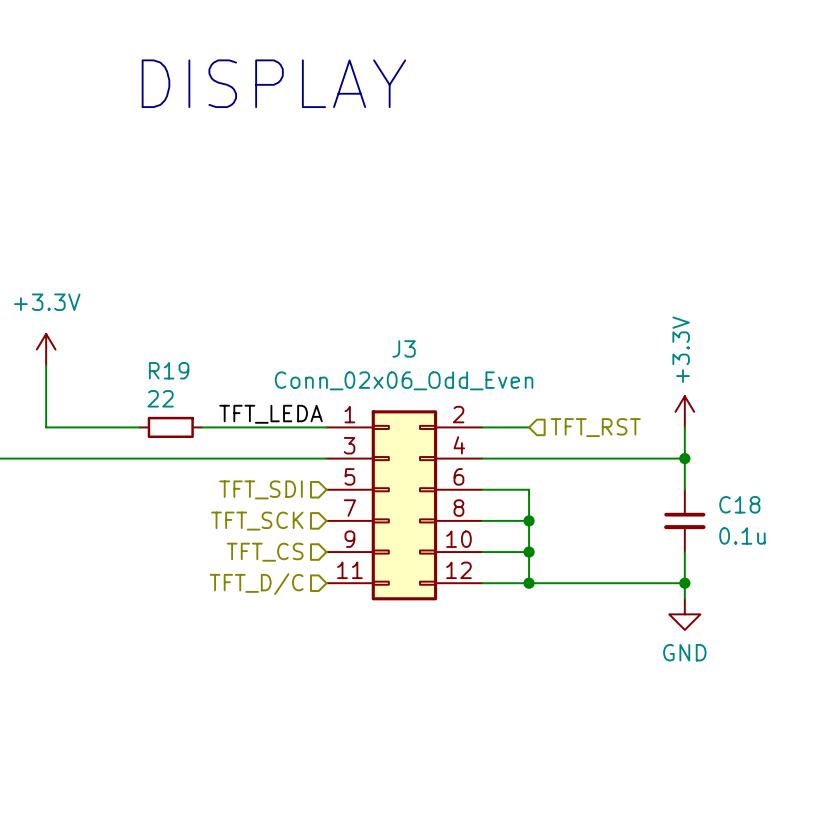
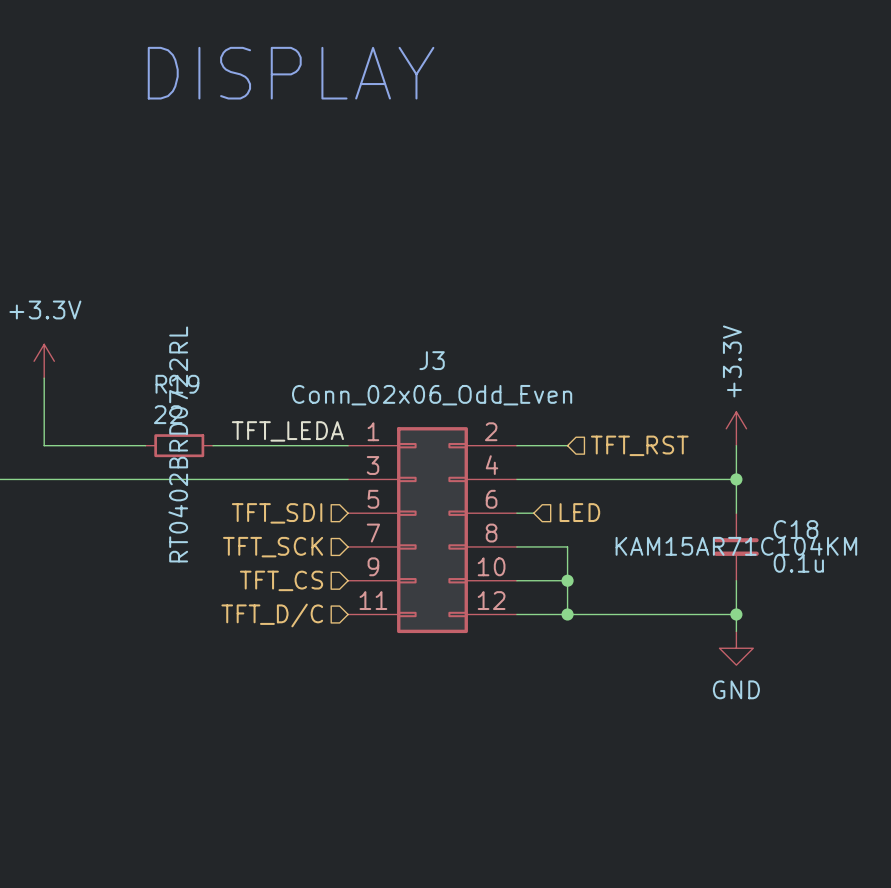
R19 text: none -> RT0402BRD0722RL (178, 444)
wire: (497, 489) (529, 489) (529, 520) -> none
hierarchical label: none -> LED (579, 512)
C18 text: none -> KAM15AR71C104KM (736, 545)
junction: (529, 520) -> none

